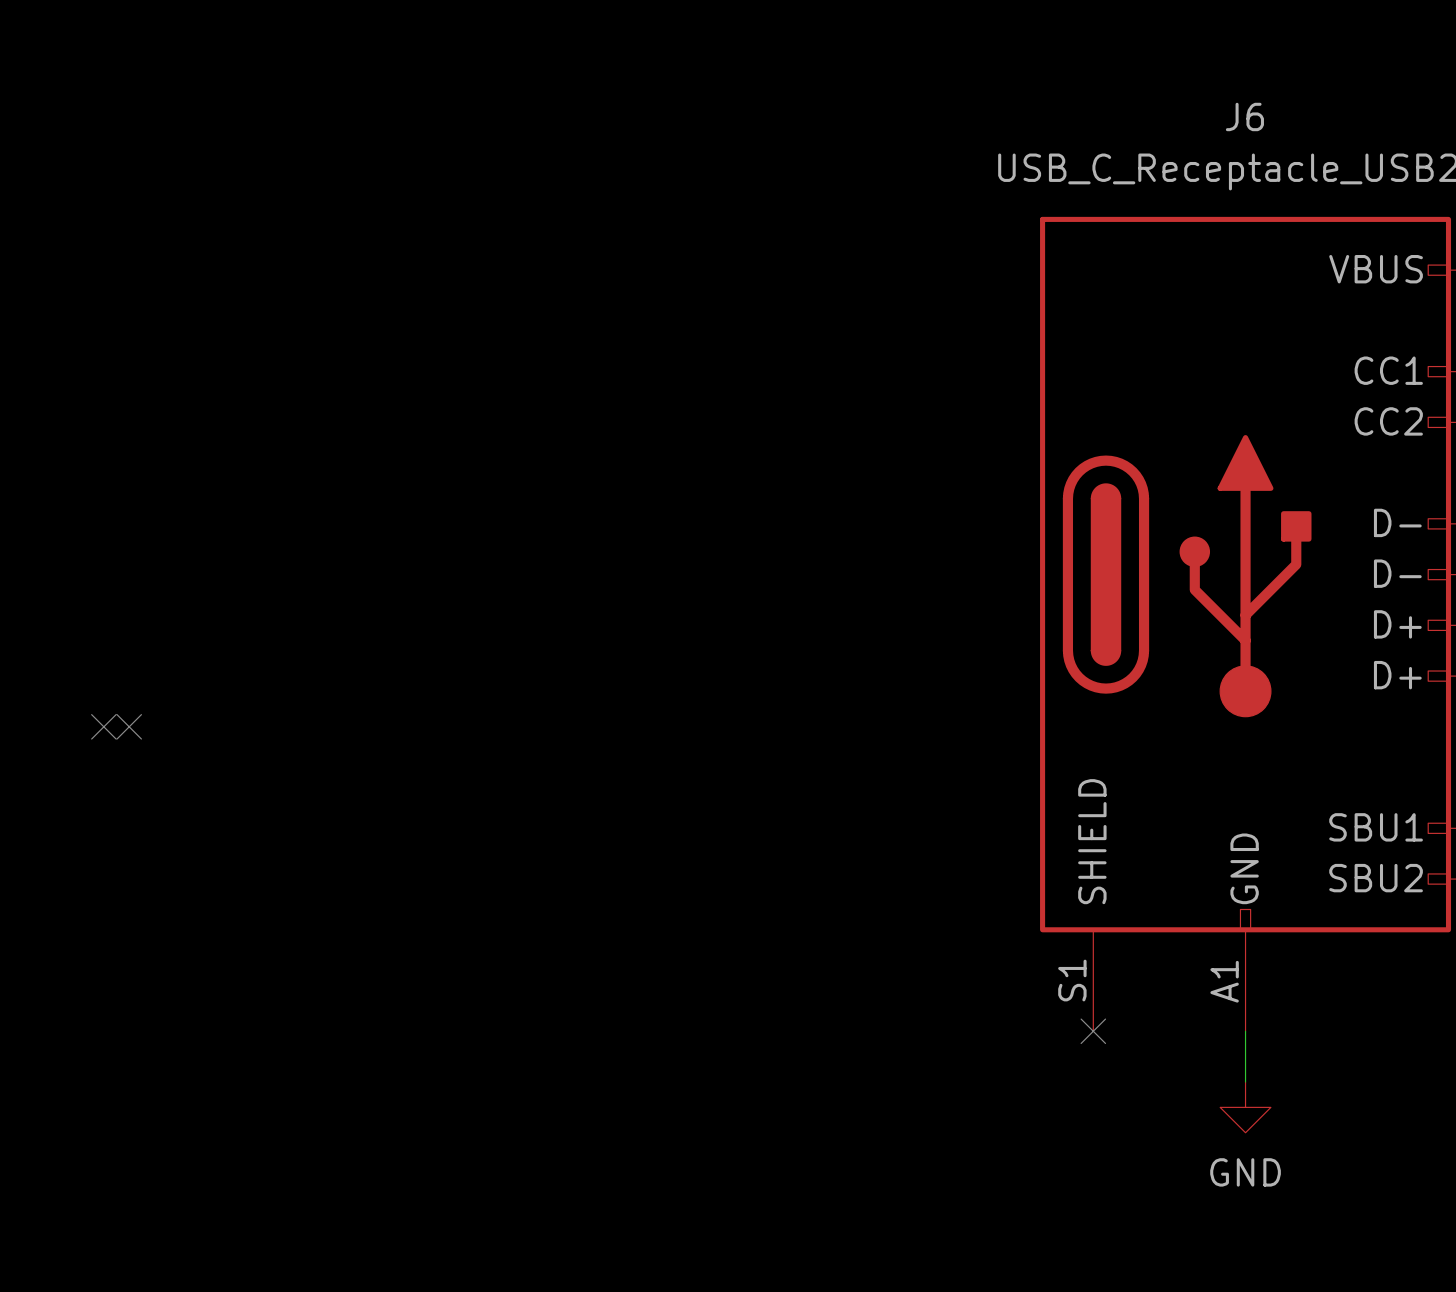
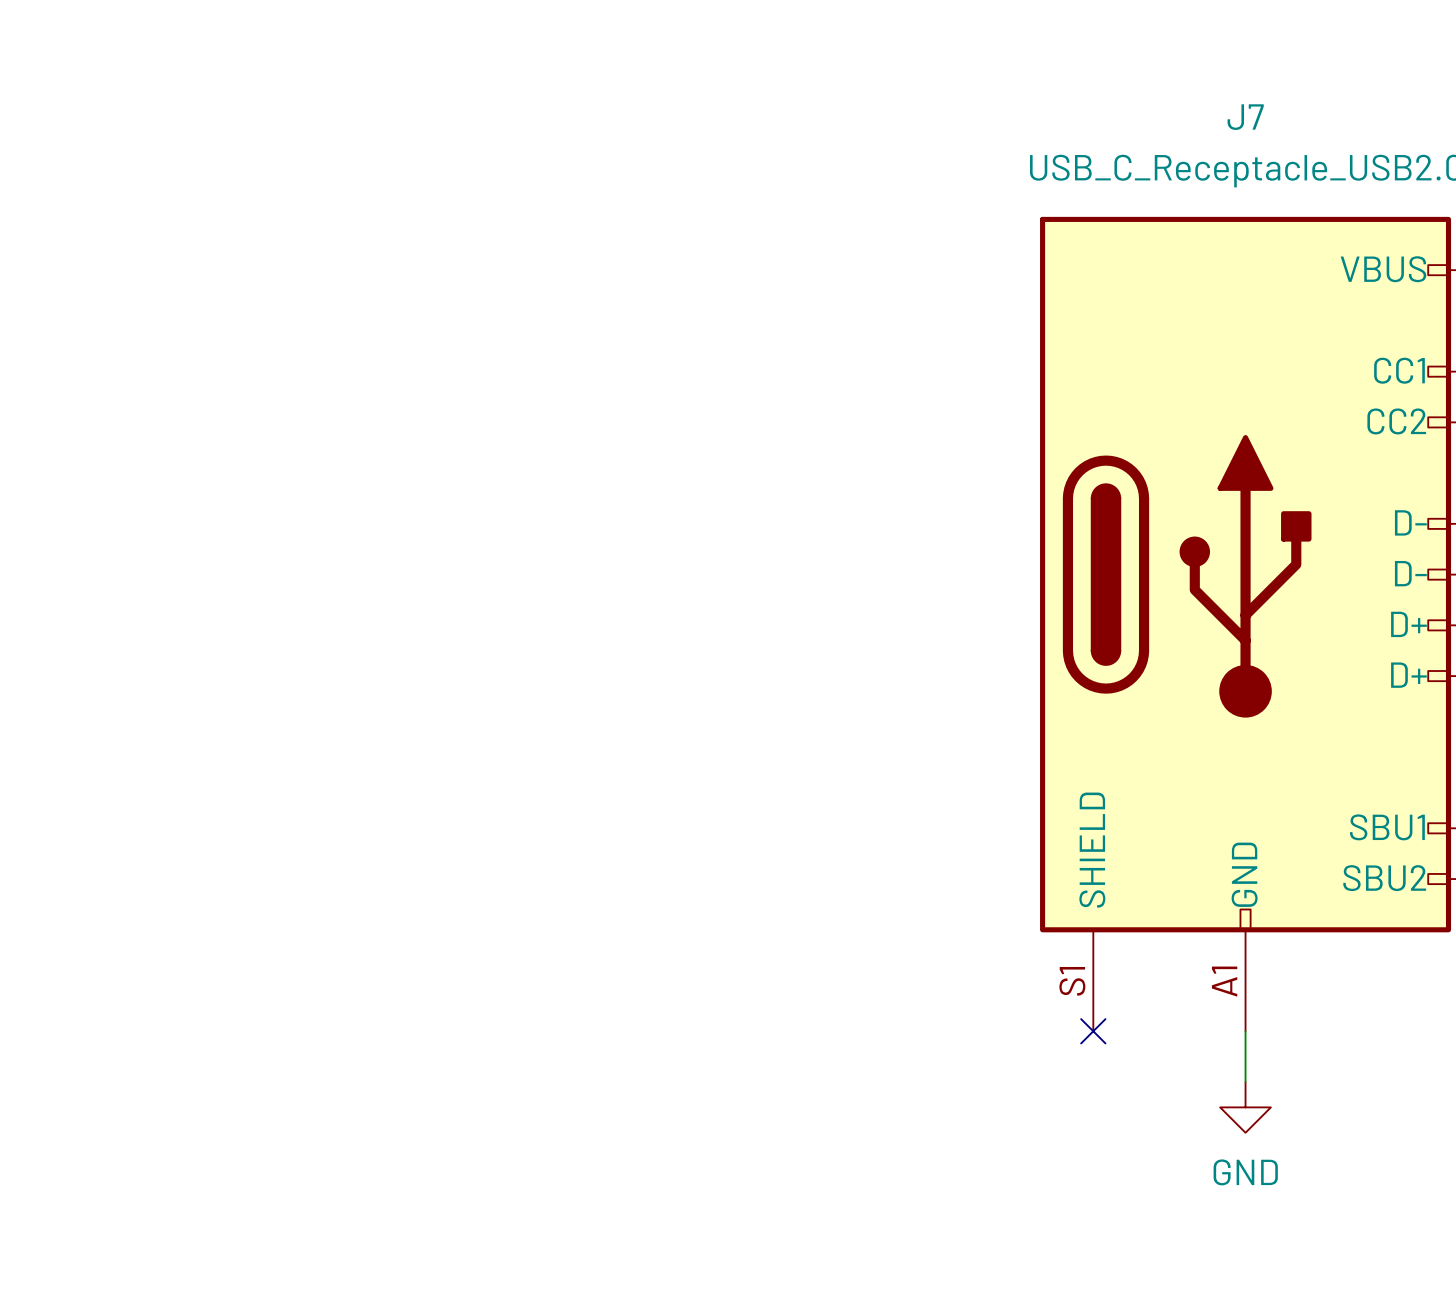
J6 name: J6 (1244, 116) -> J7 (1245, 117)
no-connect mark: (103, 726) -> none
no-connect mark: (129, 726) -> none

